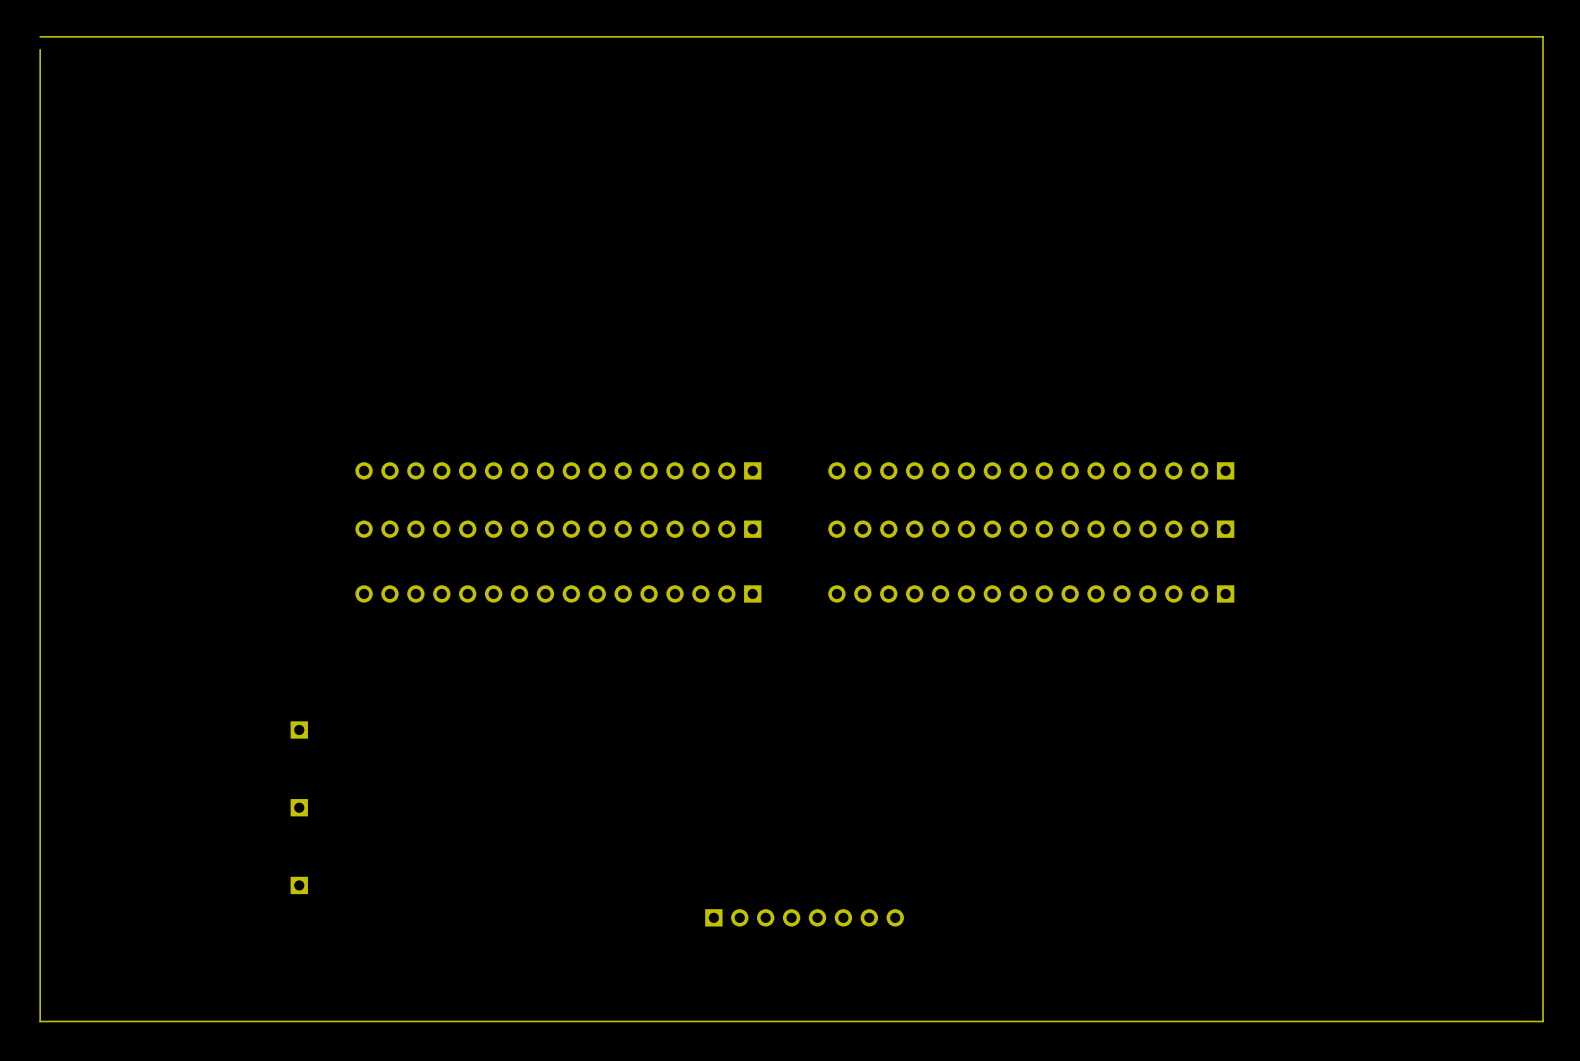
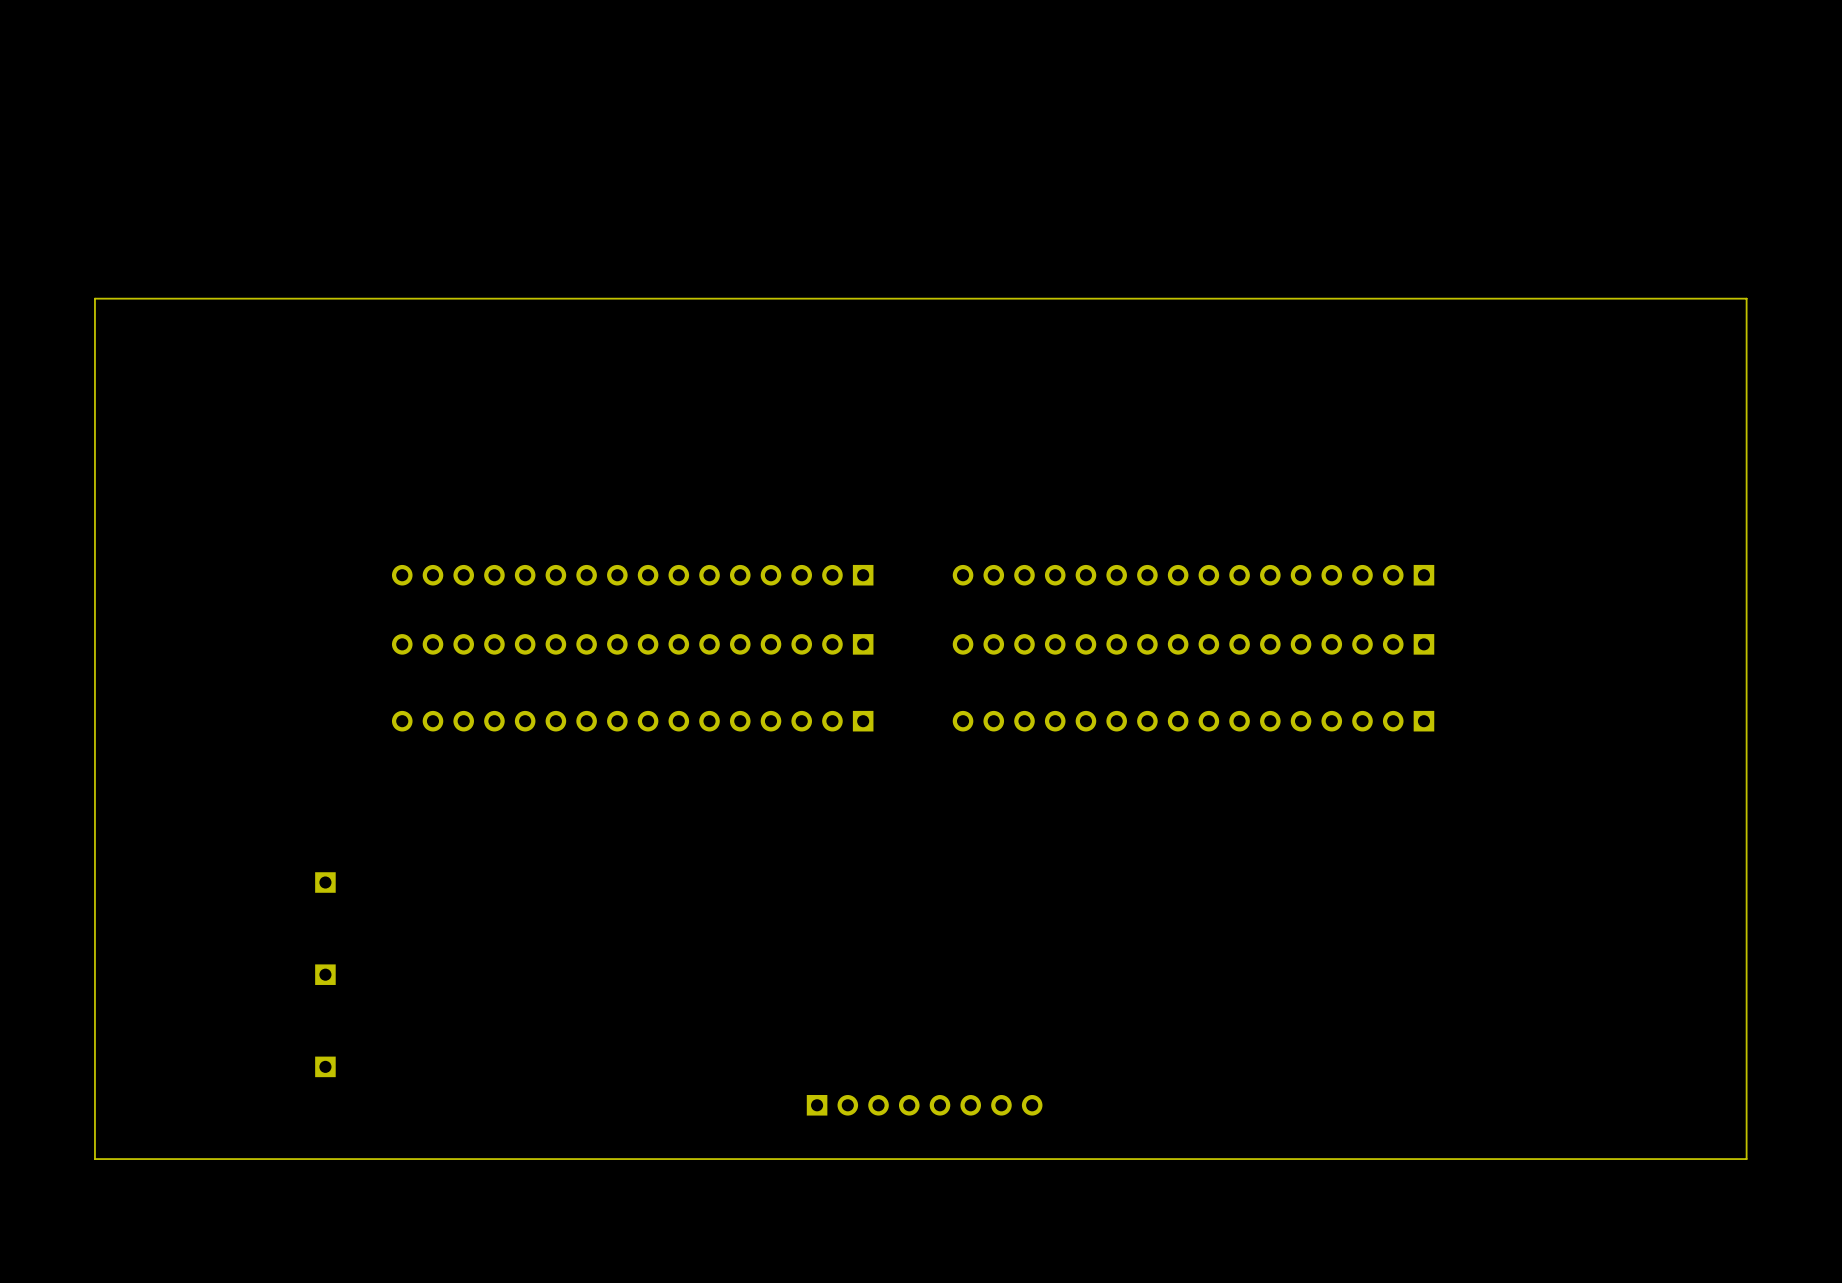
board edge: (40, 36) (1543, 36) (1543, 1021) (40, 1021) (40, 49) -> none
board edge: none -> (1746, 298) (1746, 1159) (94, 1159) (94, 298) (1746, 298)

